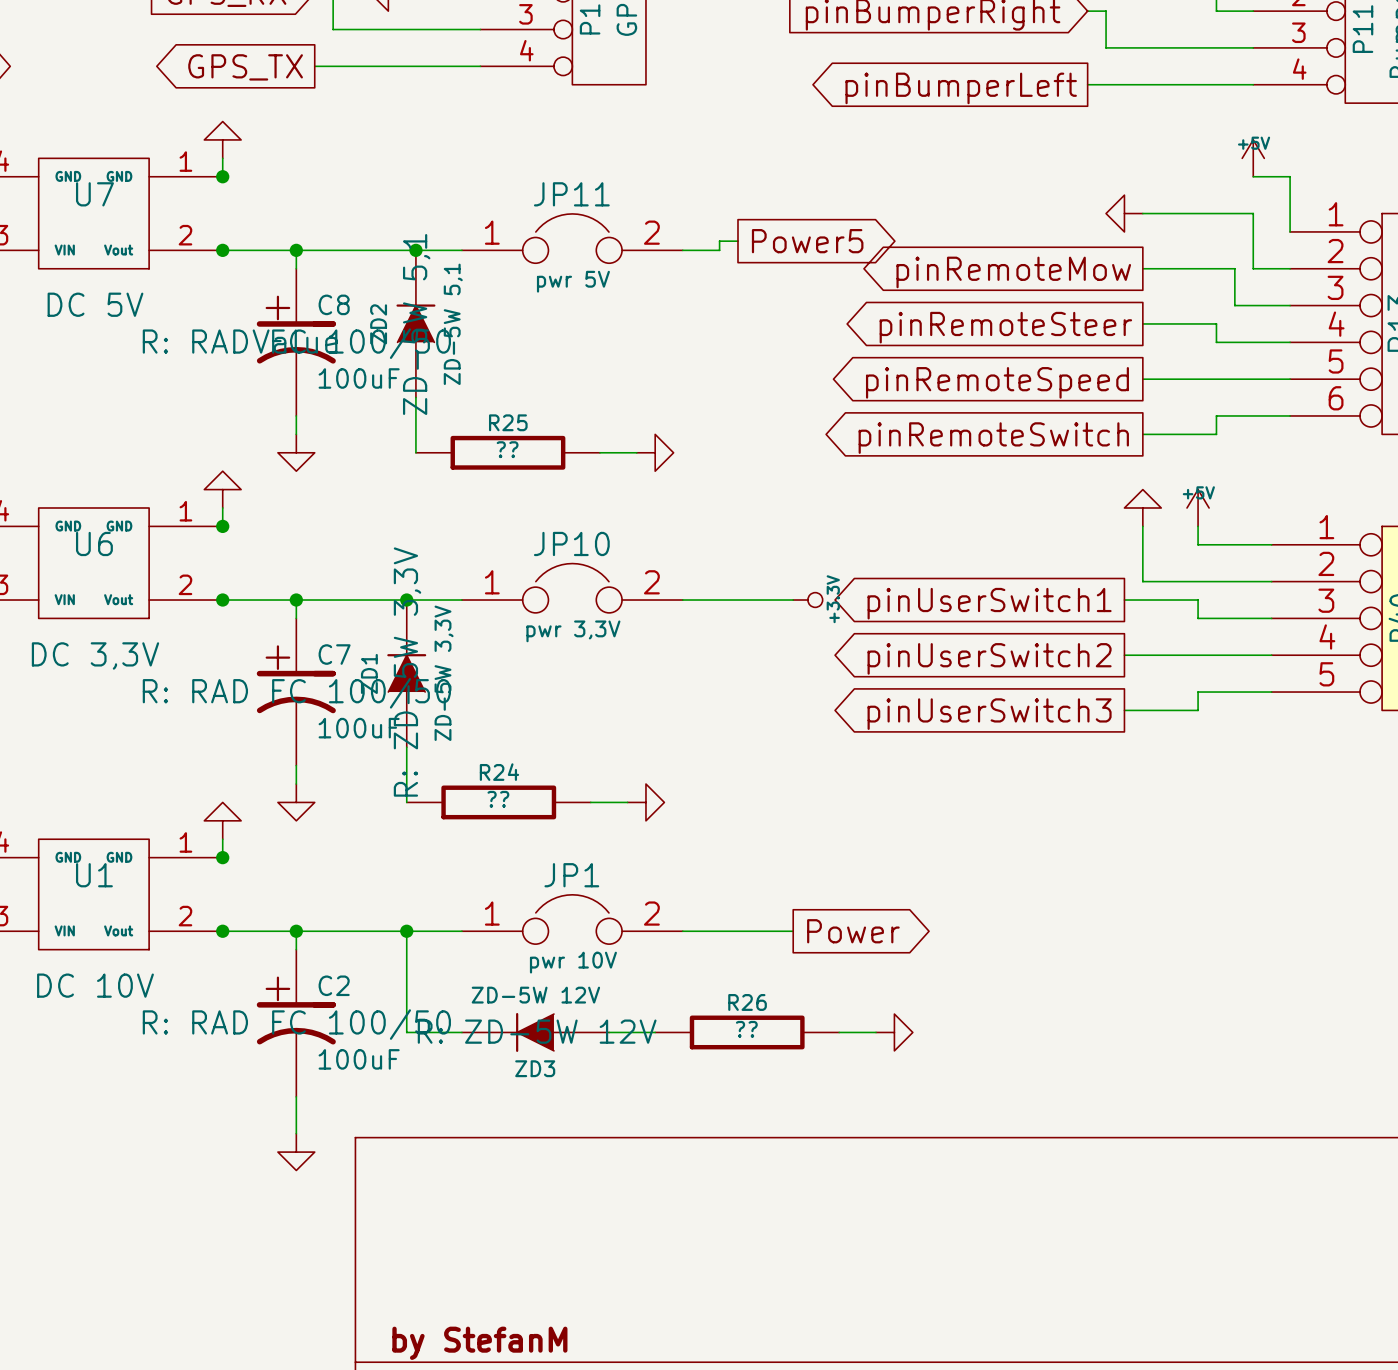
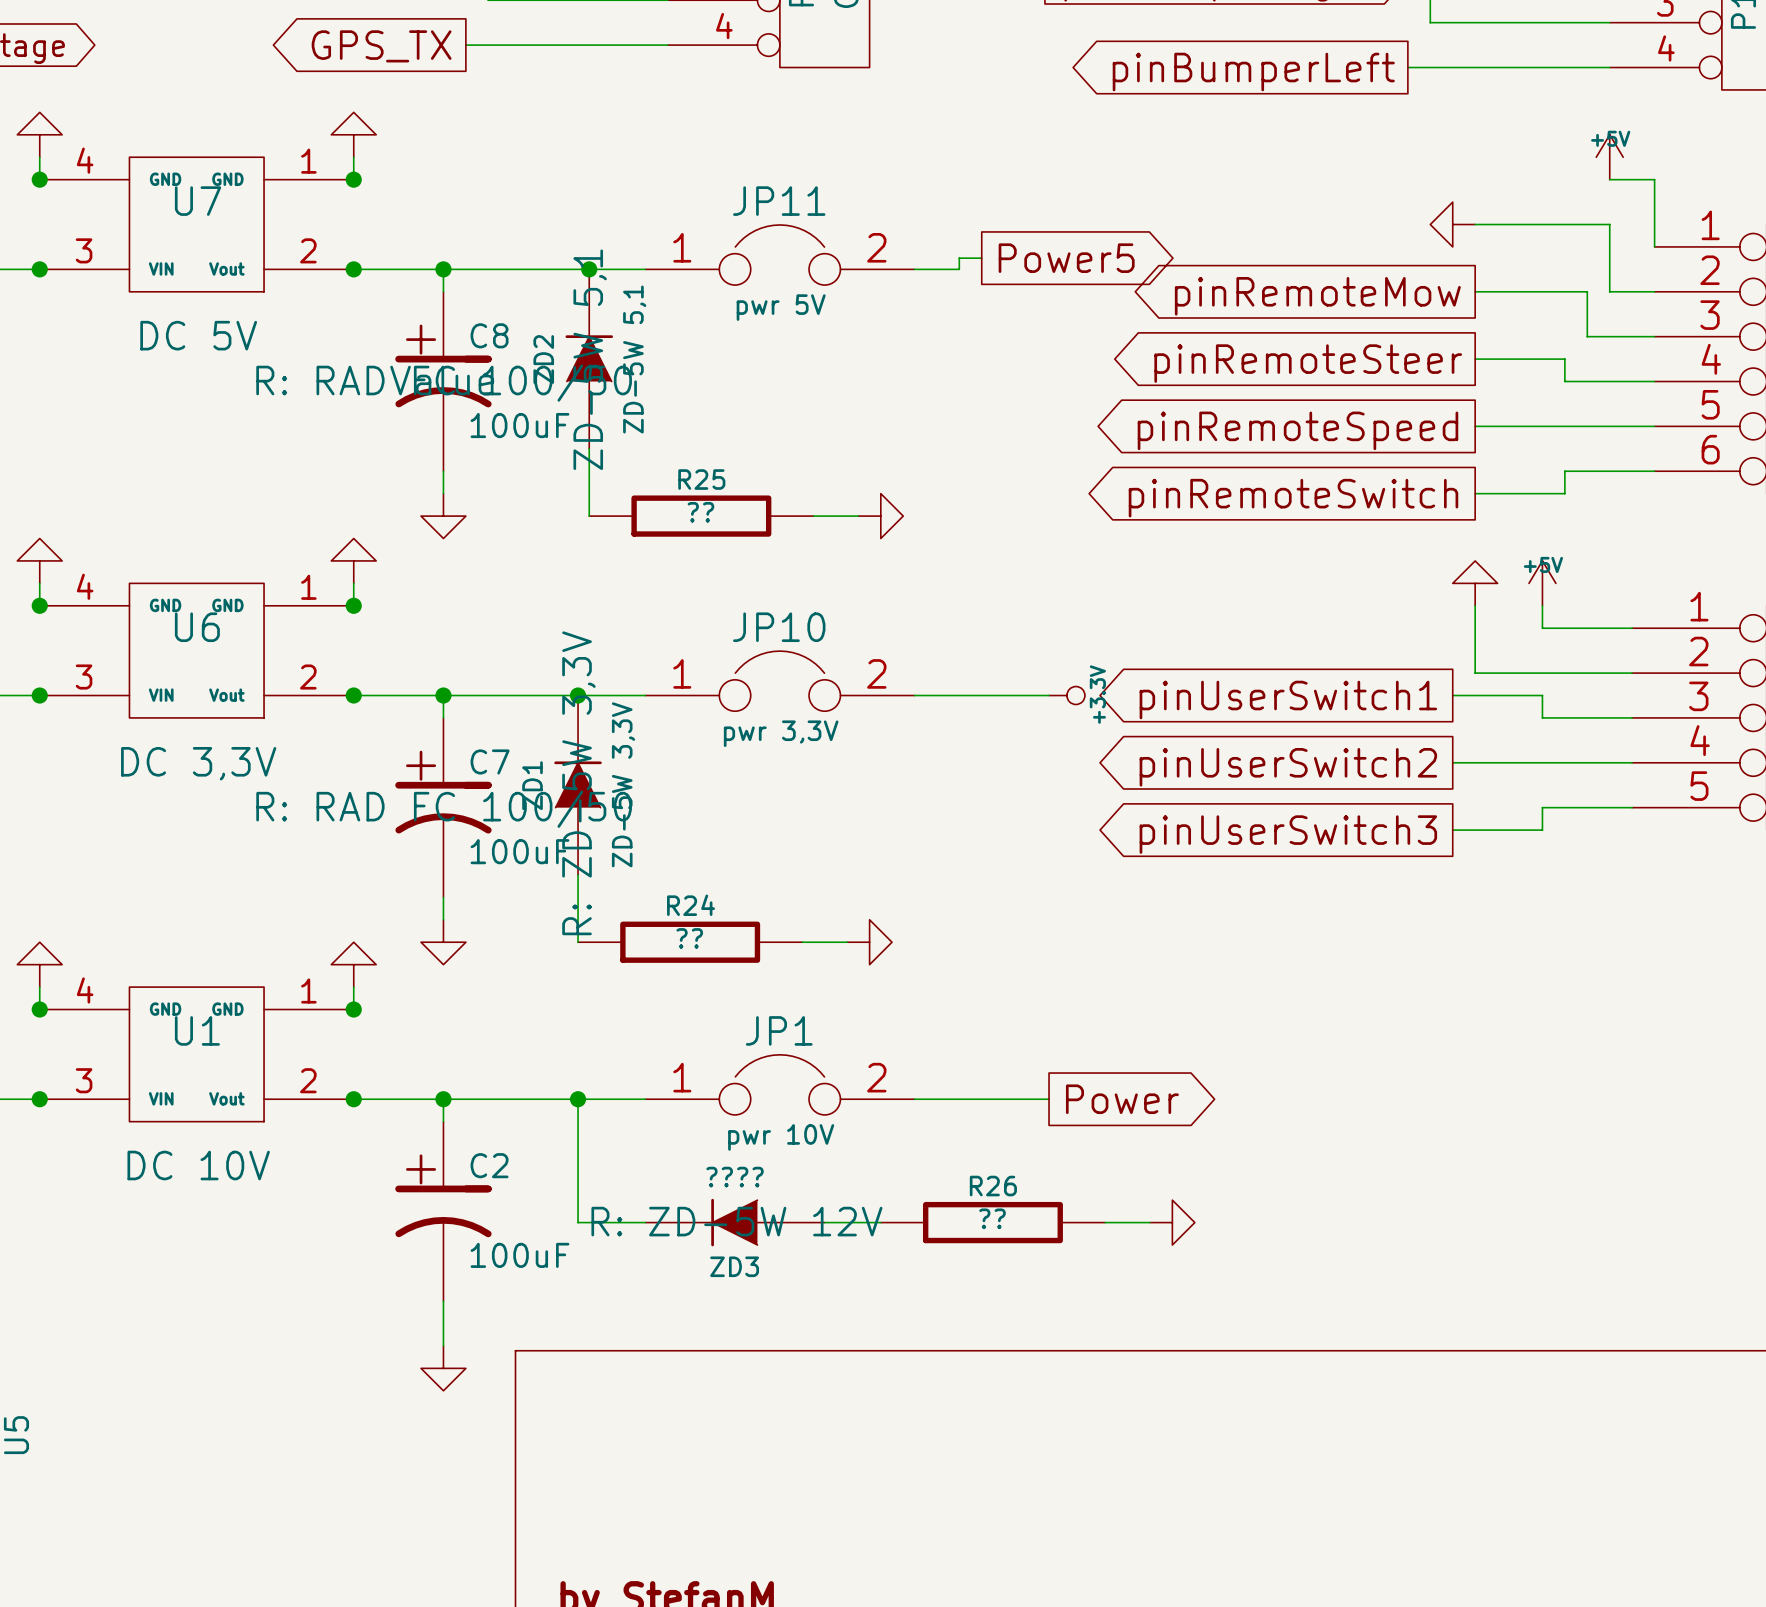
ZD3 value: ZD-5W 12V (535, 995) -> ???? (735, 1177)
C2 text: R: RAD FC 100/50 (296, 1024) -> none

